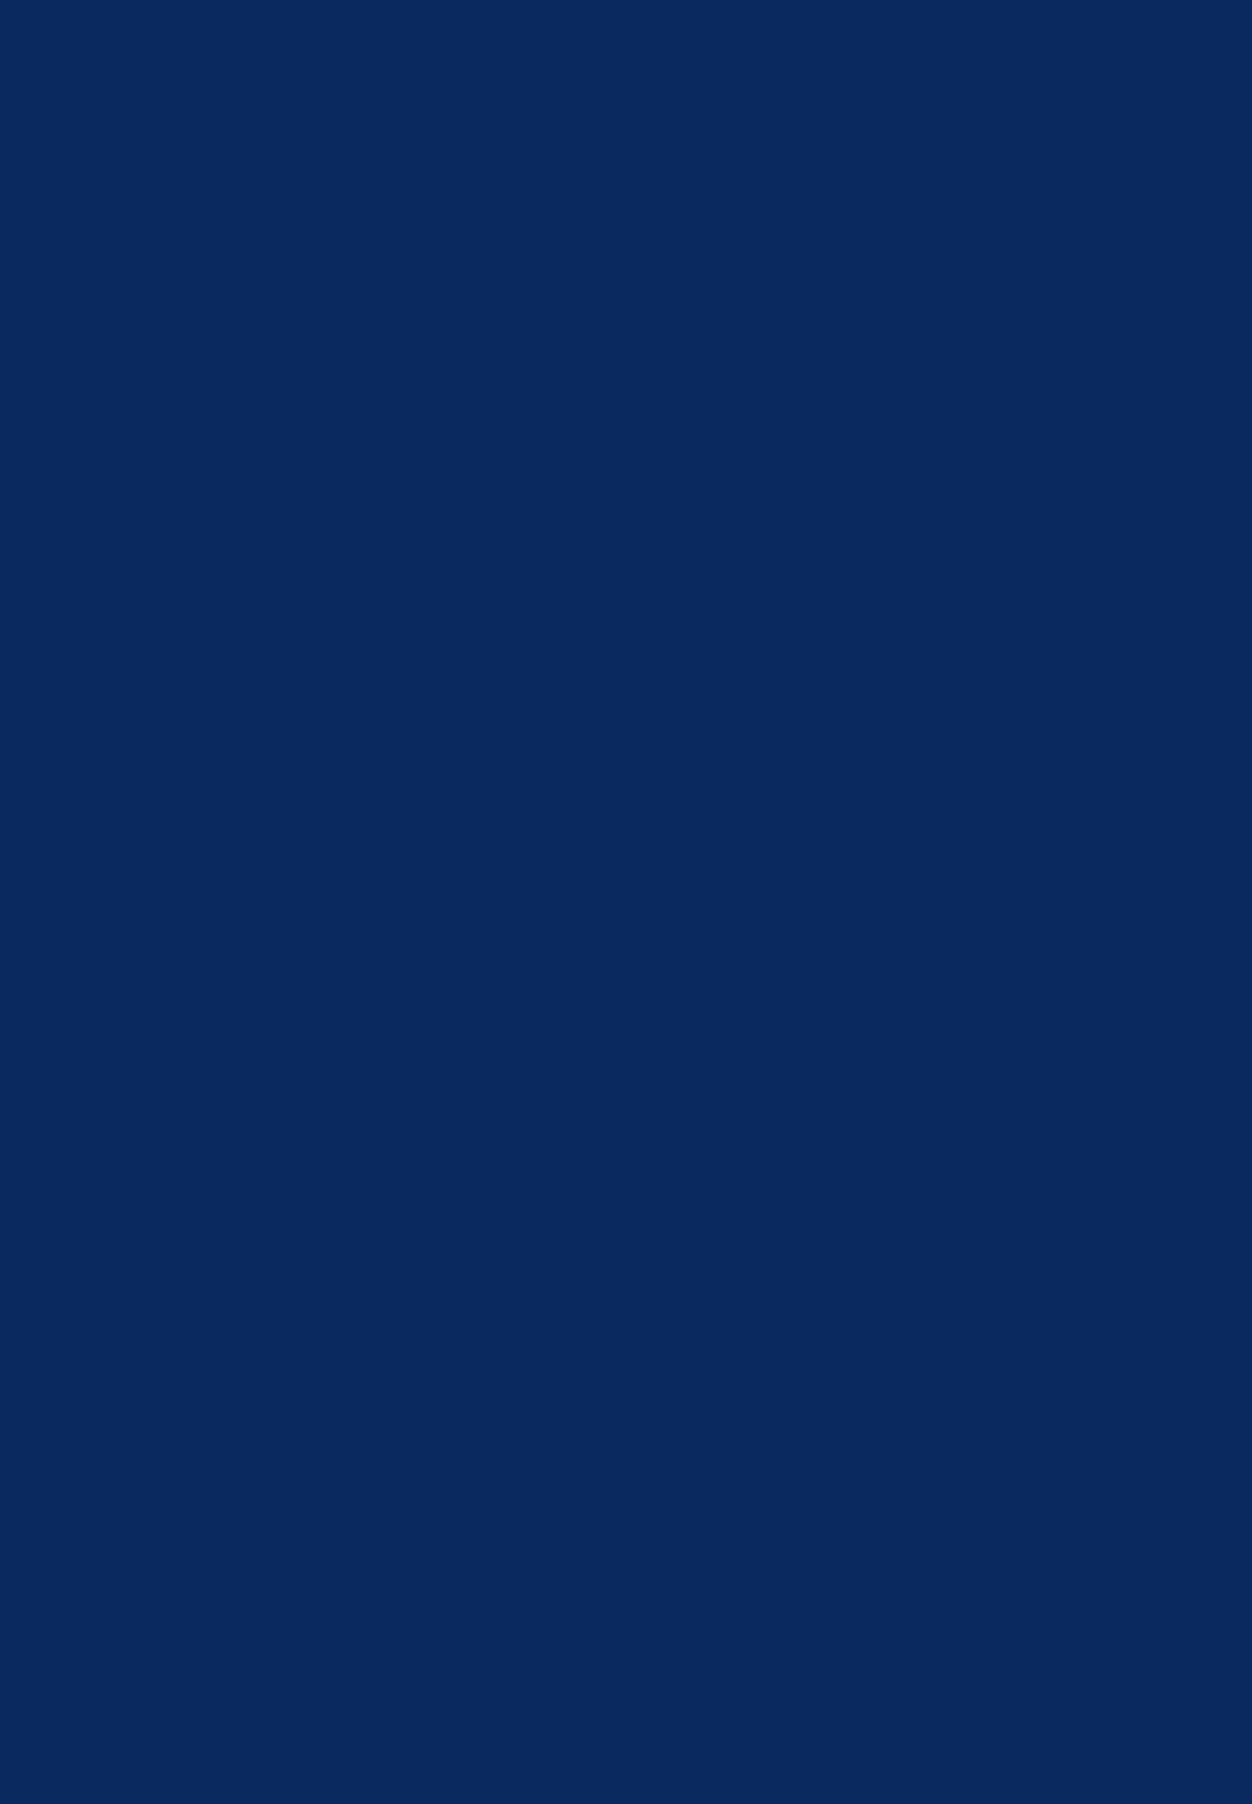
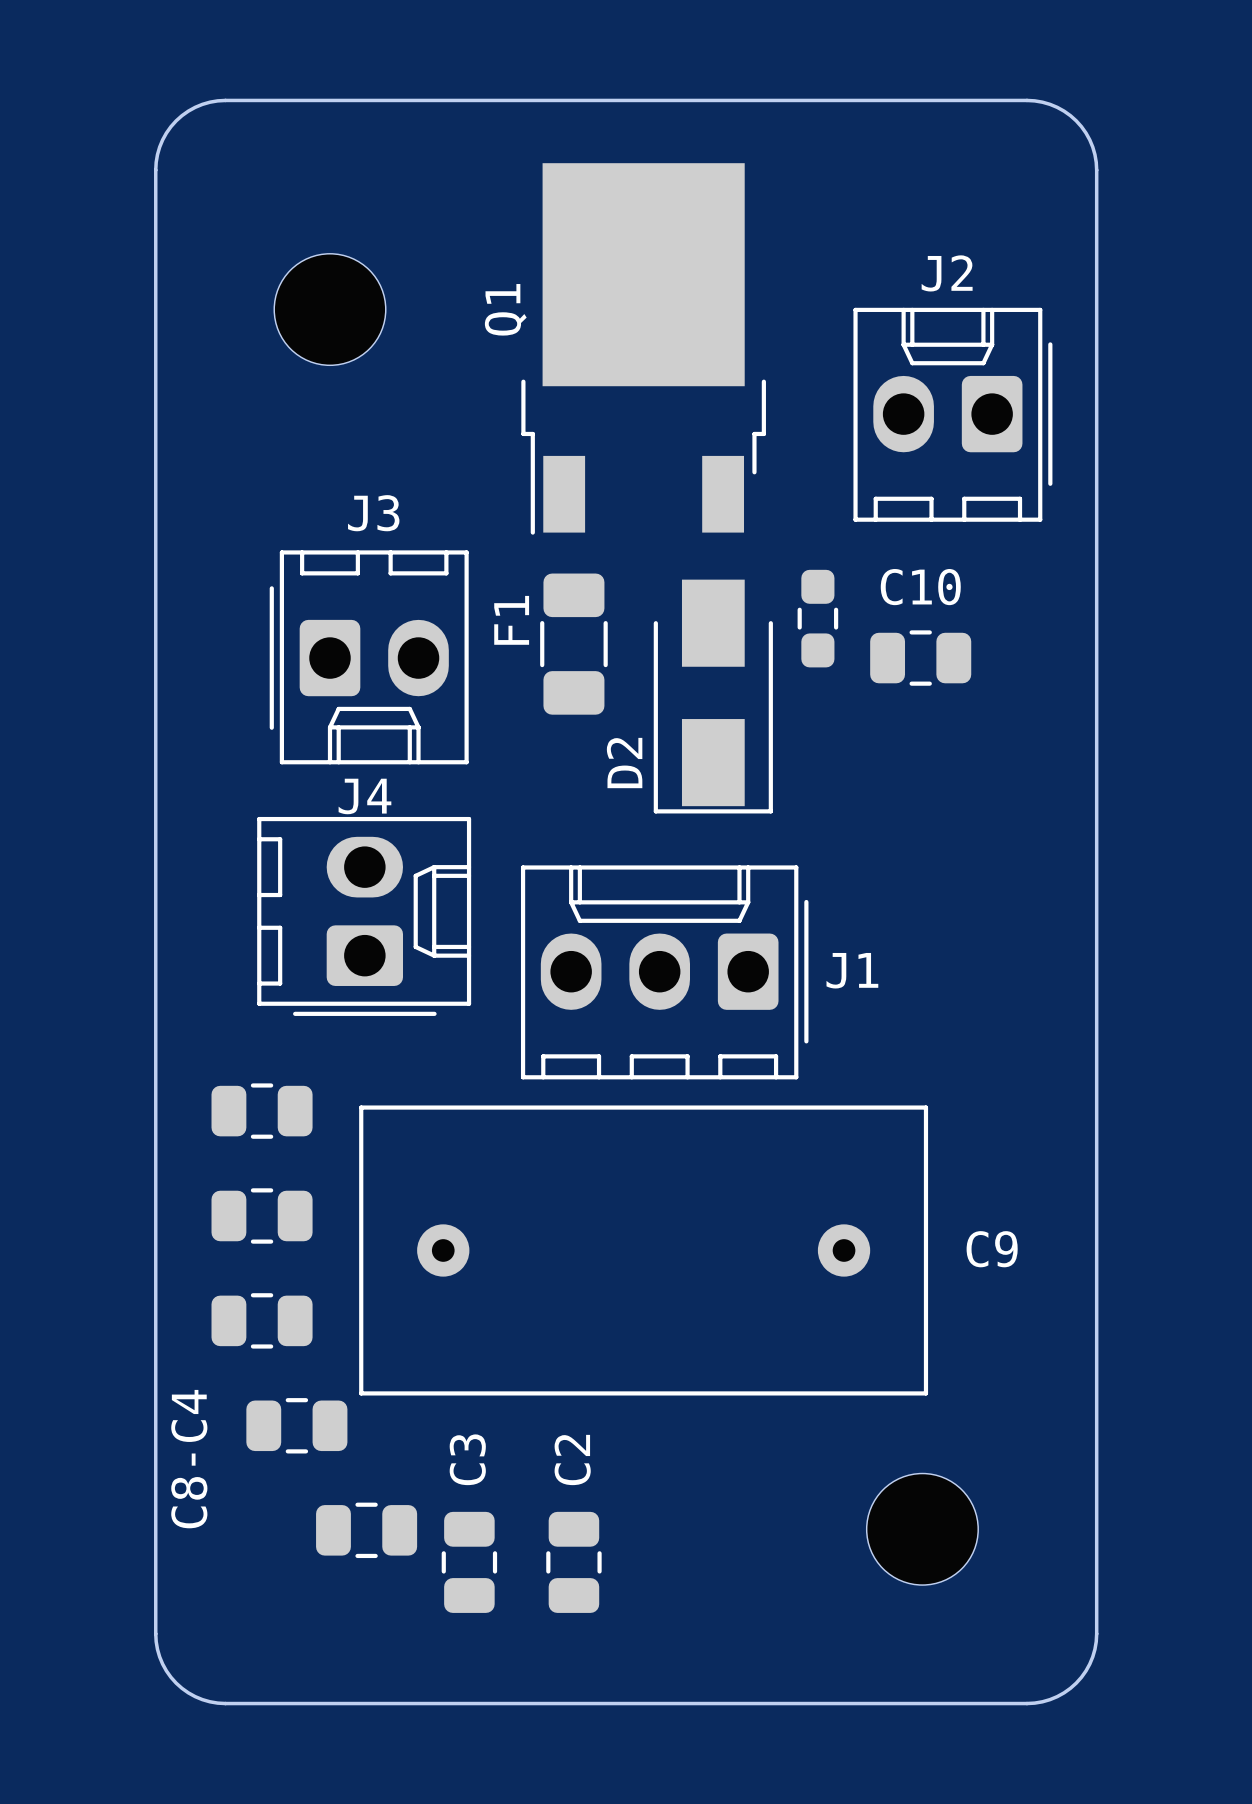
board edge: none -> (225, 100) (1026, 100) (1050, 104) (1064, 111) (1076, 120) (1089, 139) (1094, 154) (1096, 170) (1096, 1633) (1094, 1649) (1086, 1670) (1070, 1688) (1057, 1696) (1042, 1701) (1026, 1703) (225, 1703) (209, 1701) (188, 1692) (176, 1683) (162, 1664) (157, 1649) (155, 1633) (155, 170) (157, 154) (162, 139) (176, 120) (195, 107) (209, 102) (225, 100)
part: none -> (329, 309)
Q1: none -> (643, 348)
J2: none -> (952, 414)
part: none -> (817, 618)
F1: none -> (573, 644)
J3: none -> (369, 657)
C10: none -> (920, 658)
D2: none -> (713, 696)
J4: none -> (364, 916)
J1: none -> (664, 972)
C8-C4: none -> (262, 1111)
part: none -> (262, 1215)
C9: none -> (643, 1250)
part: none -> (262, 1320)
part: none -> (296, 1425)
part: none -> (922, 1529)
part: none -> (366, 1530)
C3: none -> (469, 1562)
C2: none -> (573, 1562)

